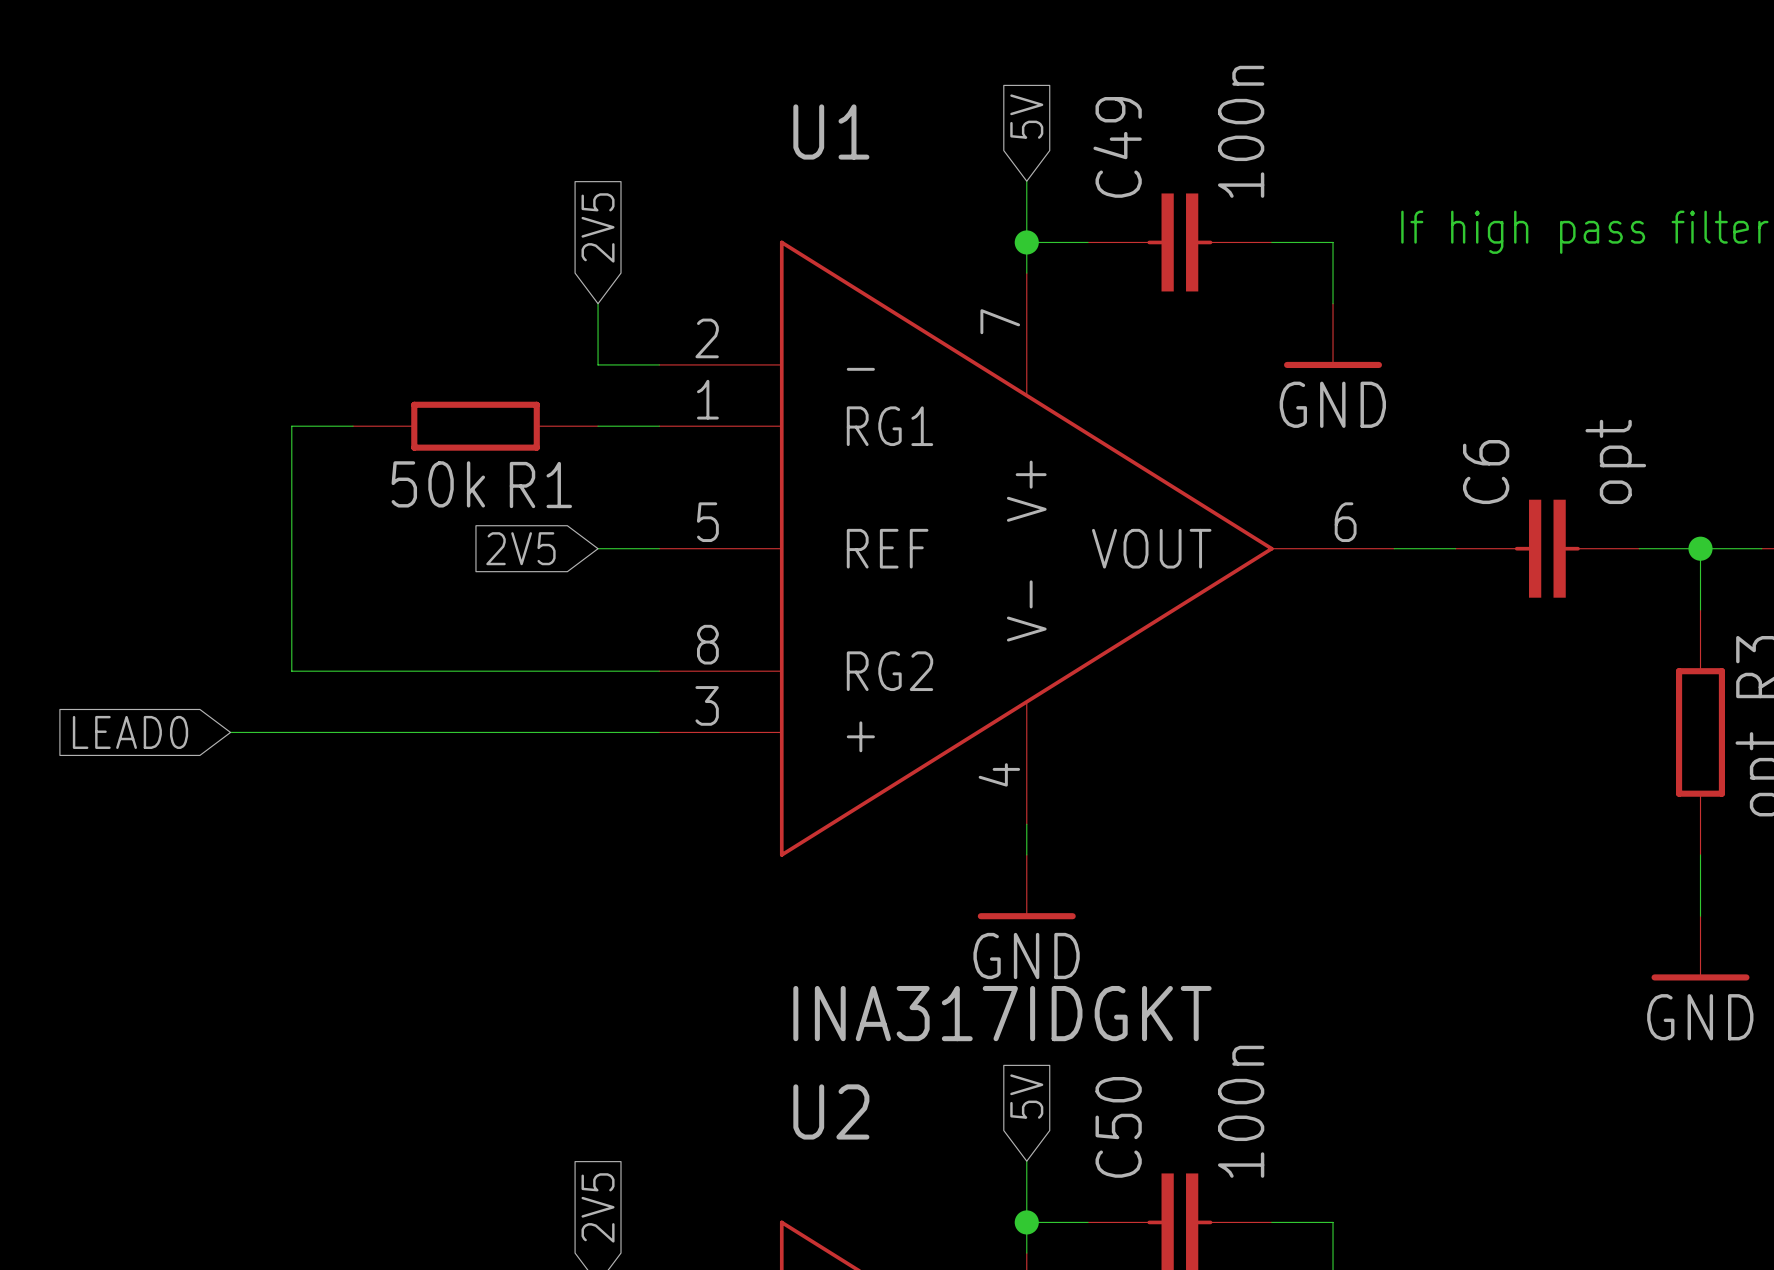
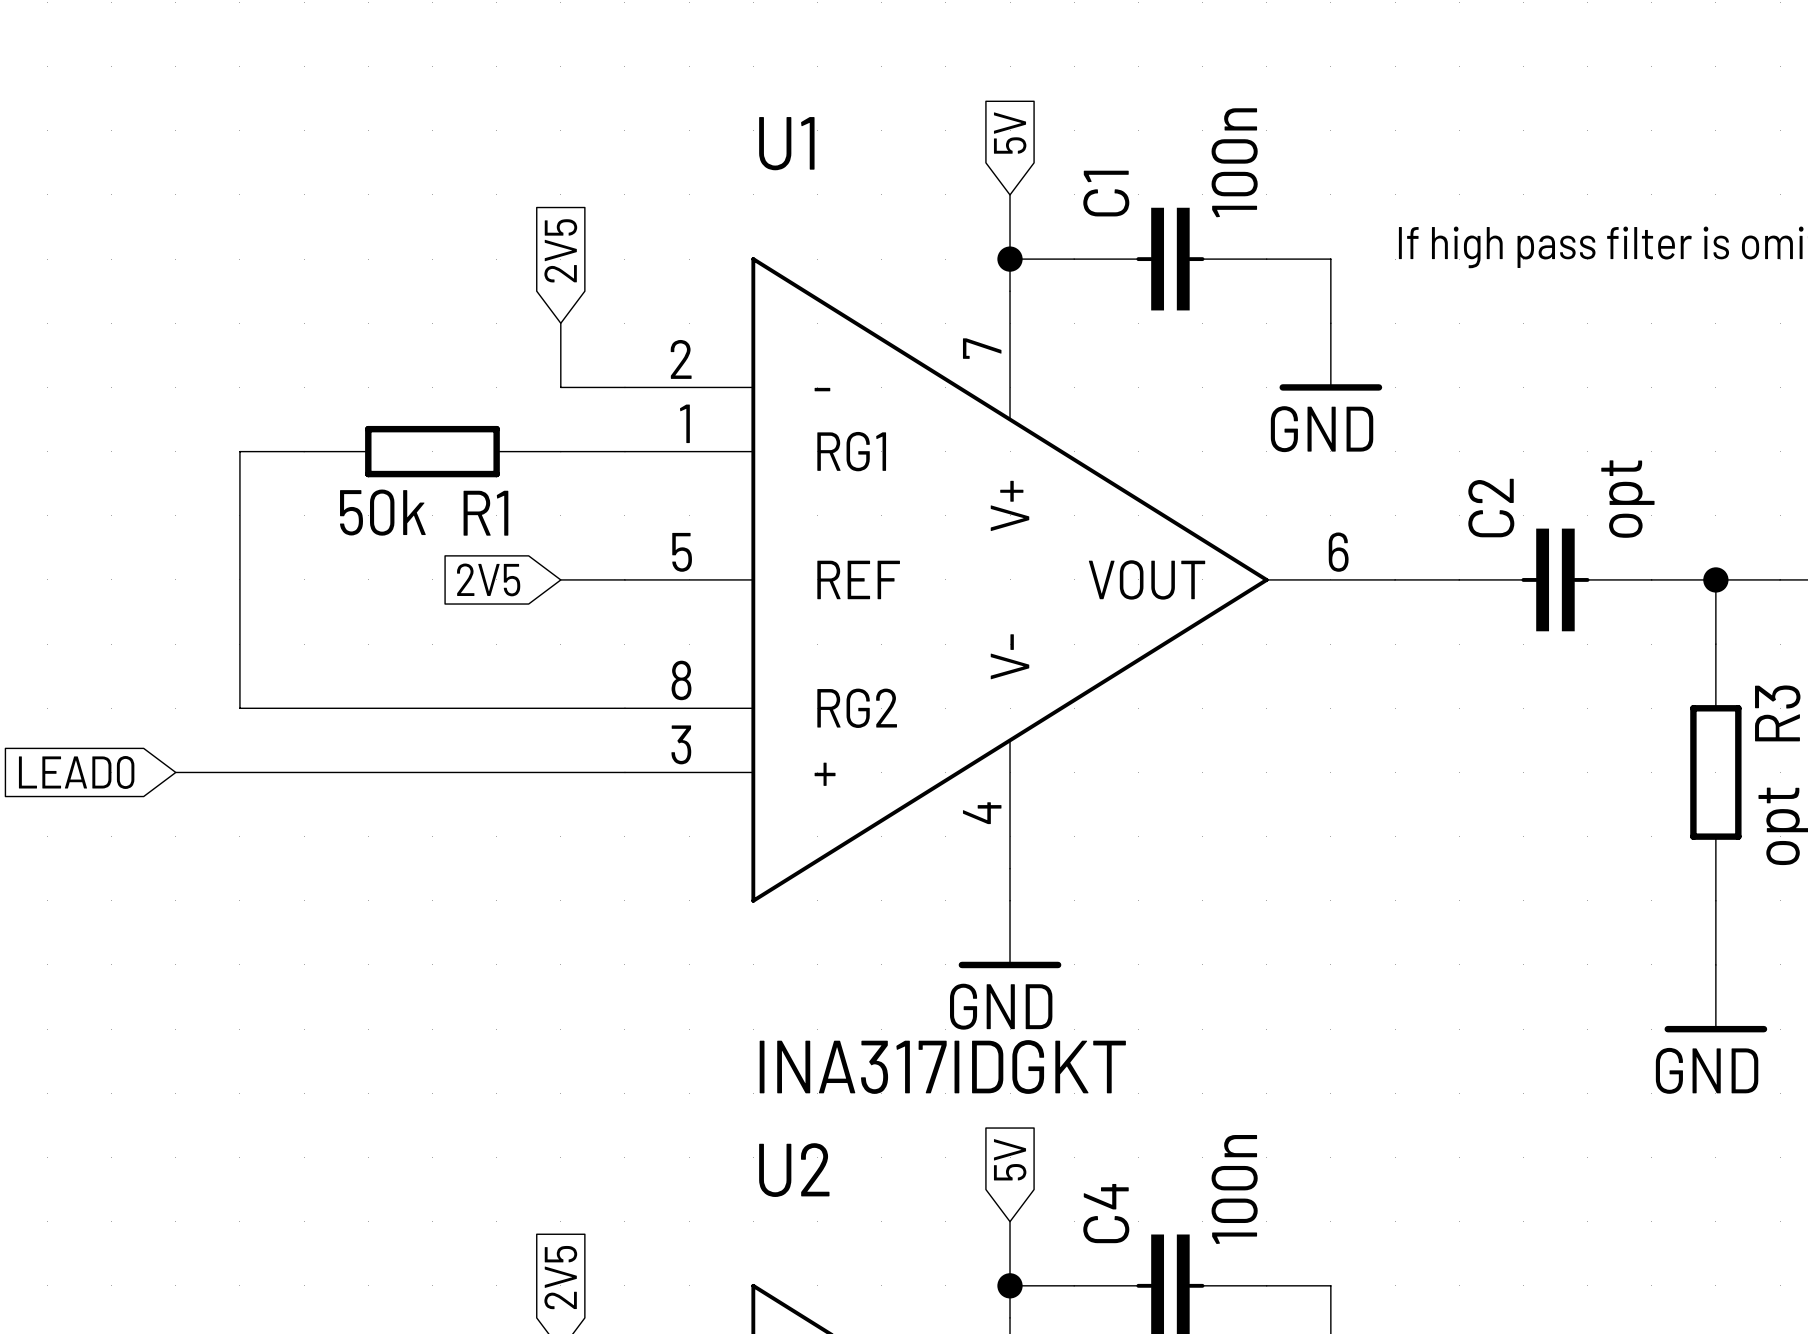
C49 name: C49 (1117, 147) -> C1 (1106, 193)
C6 name: C6 (1486, 472) -> C2 (1491, 508)
C50 name: C50 (1118, 1127) -> C4 (1106, 1213)

